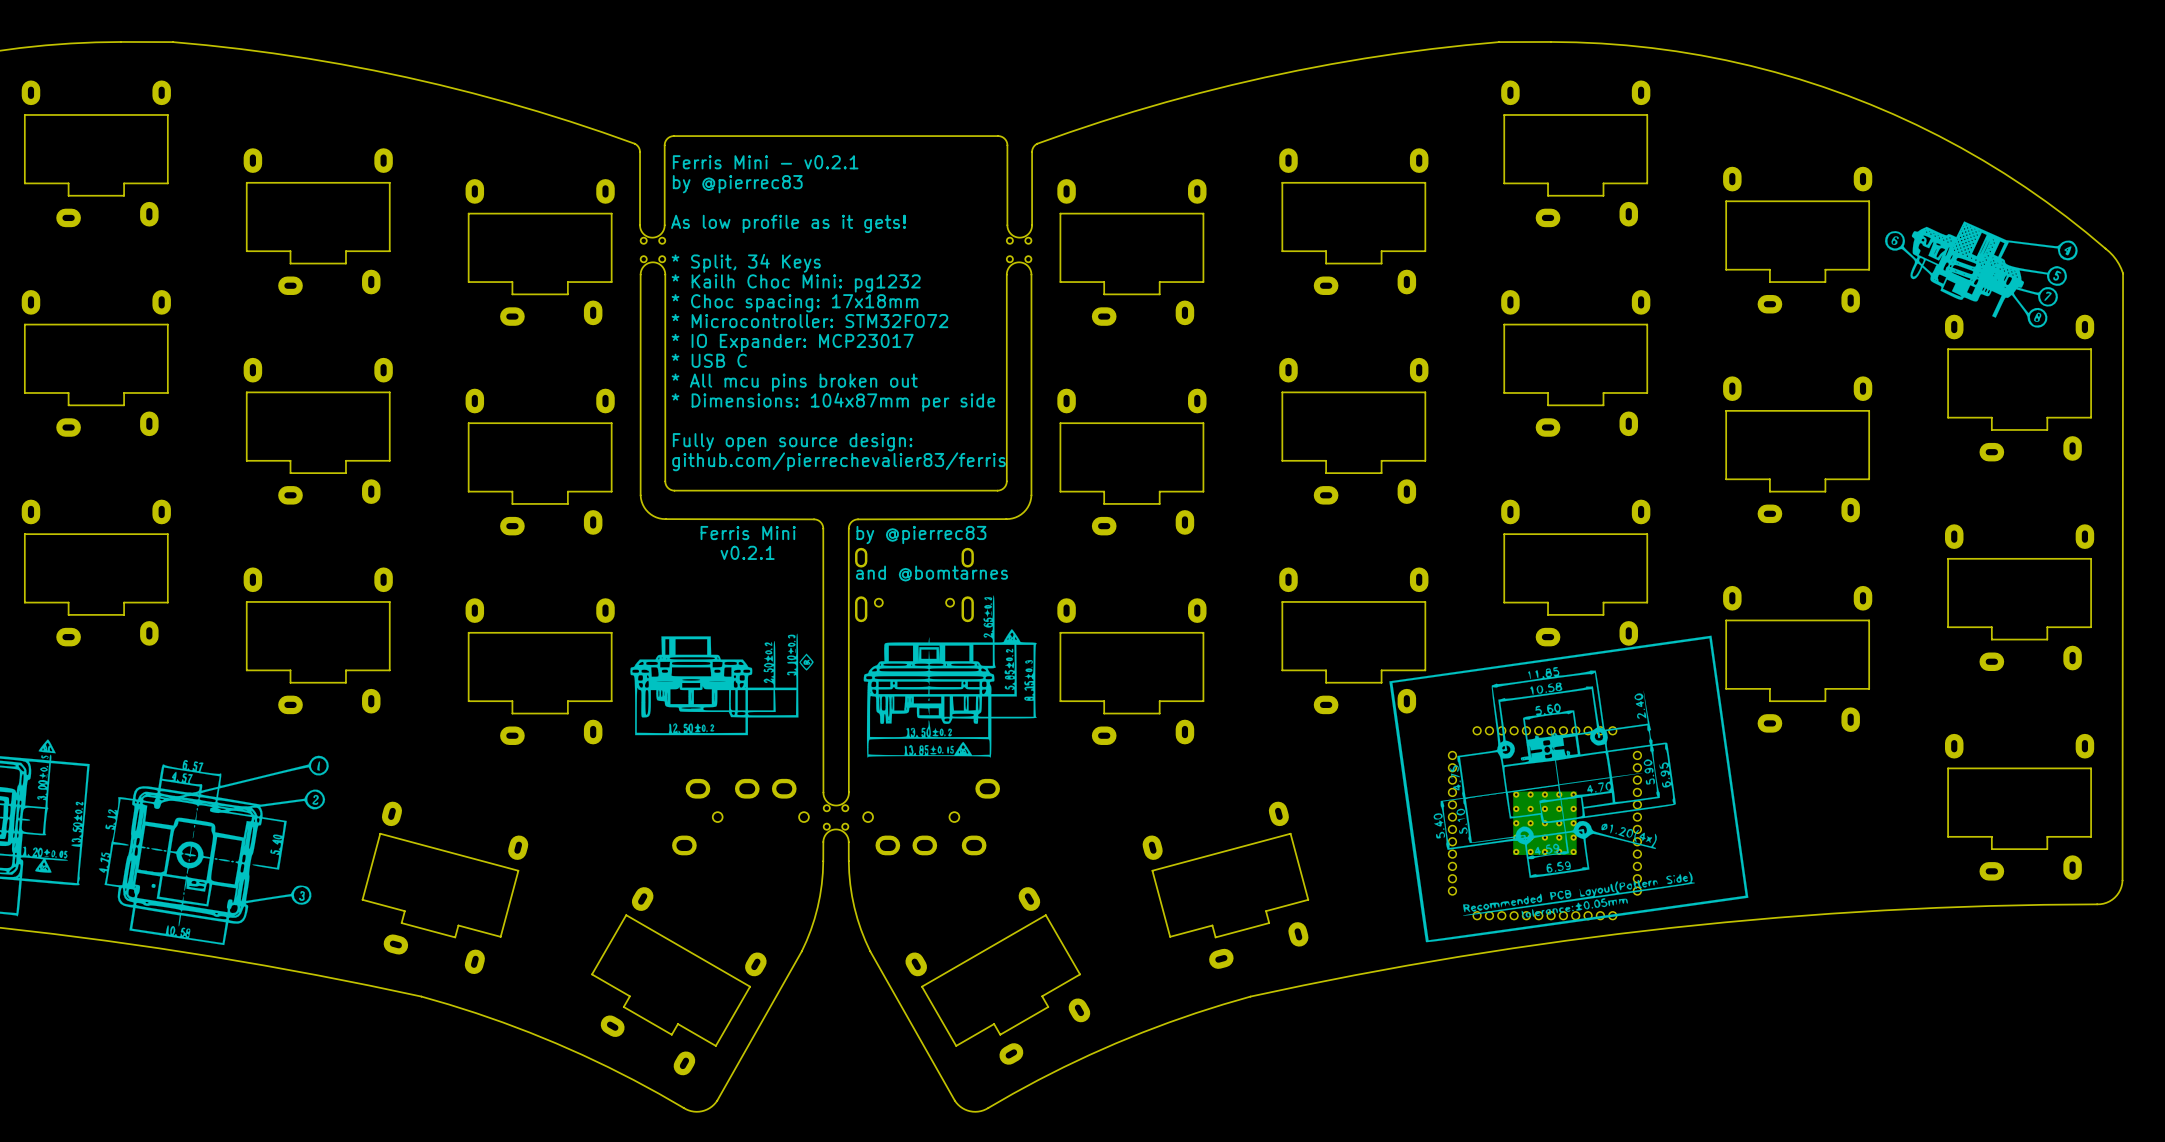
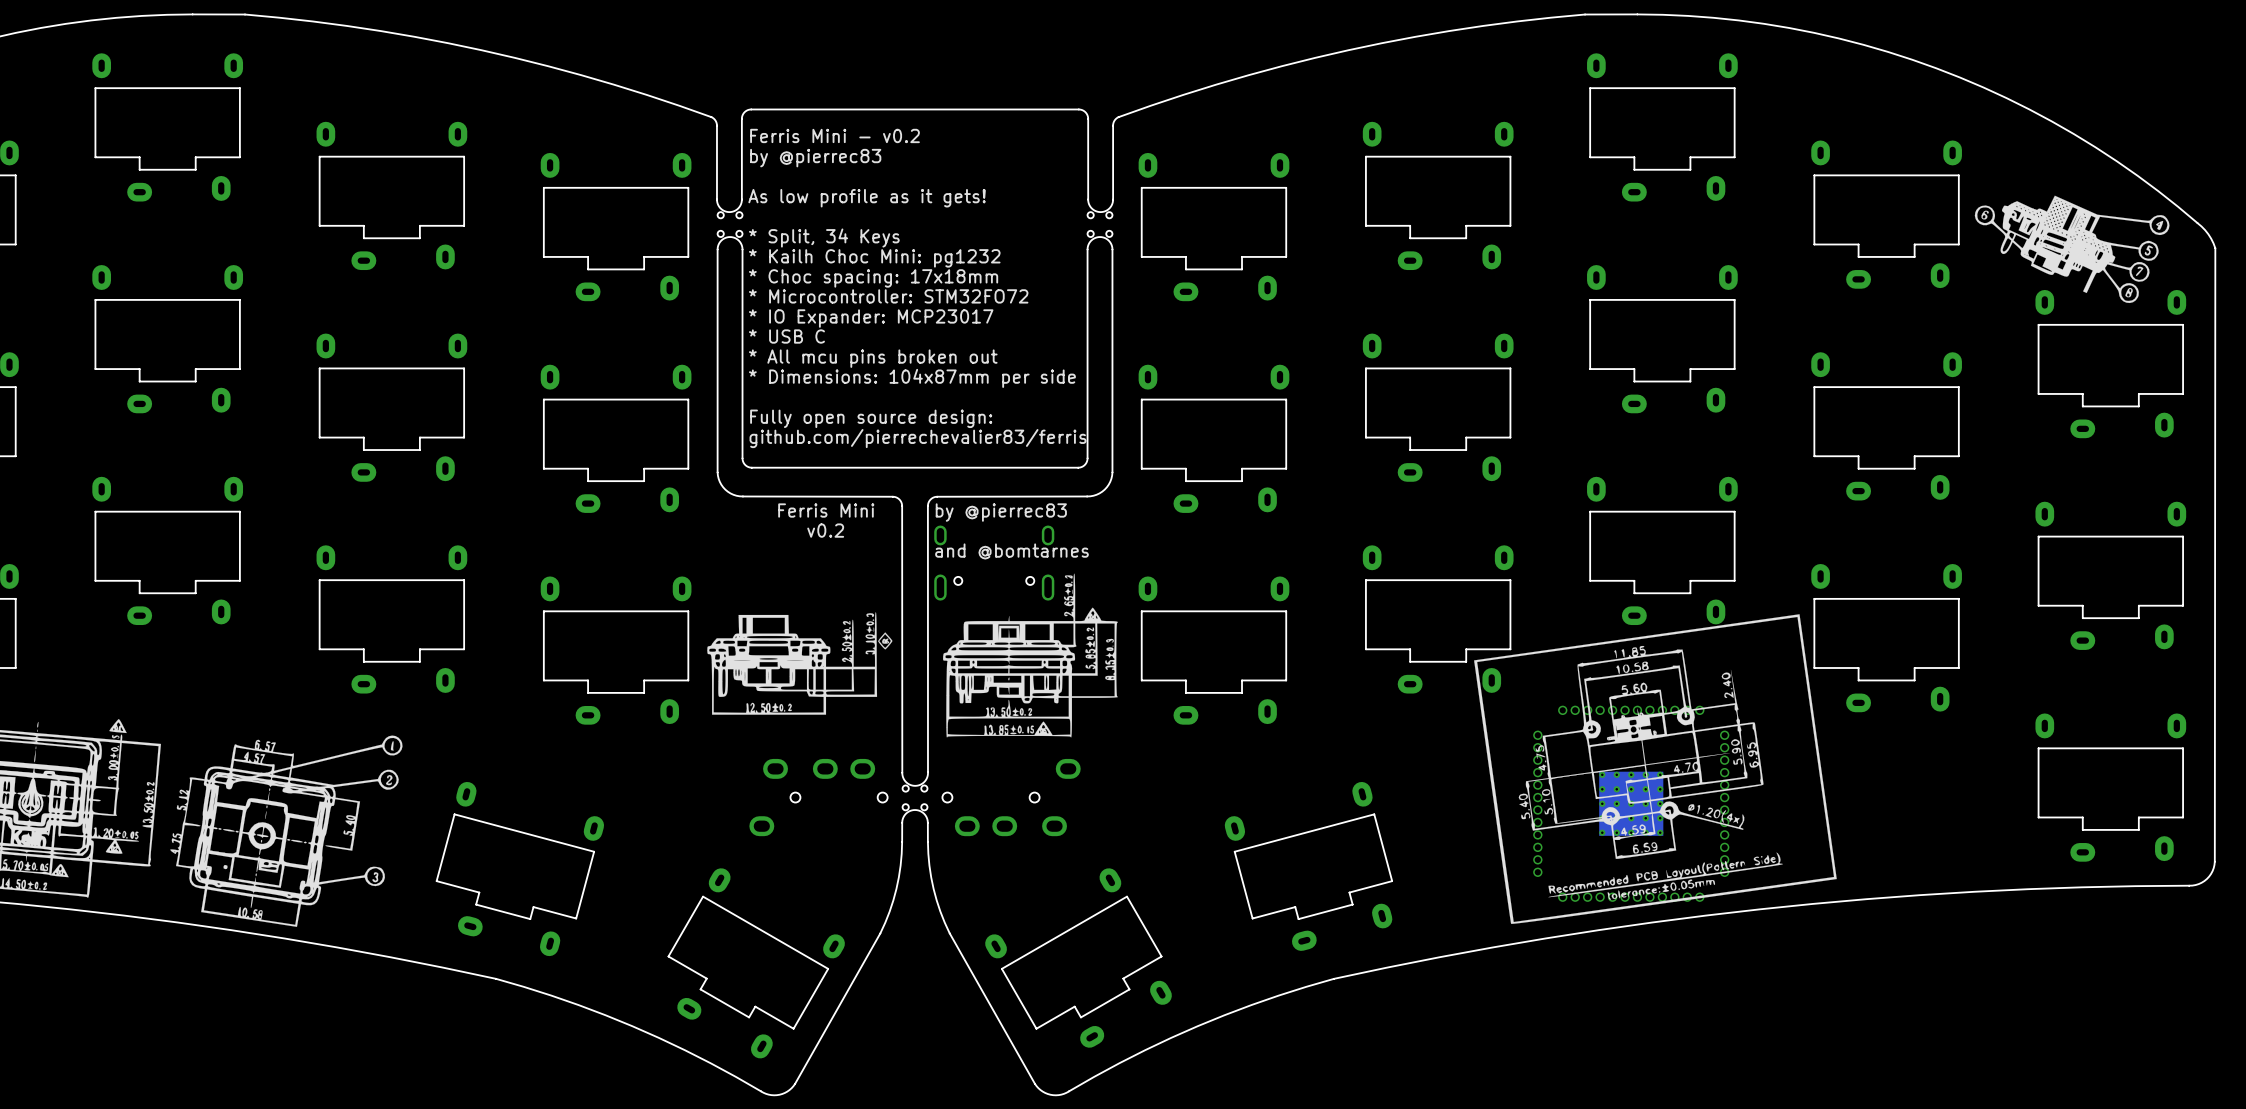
text: Ferris Mini - v0.2.1 (765, 162) -> Ferris Mini - v0.2 (835, 135)
text: v0.2.1 (747, 552) -> v0.2 (825, 530)

